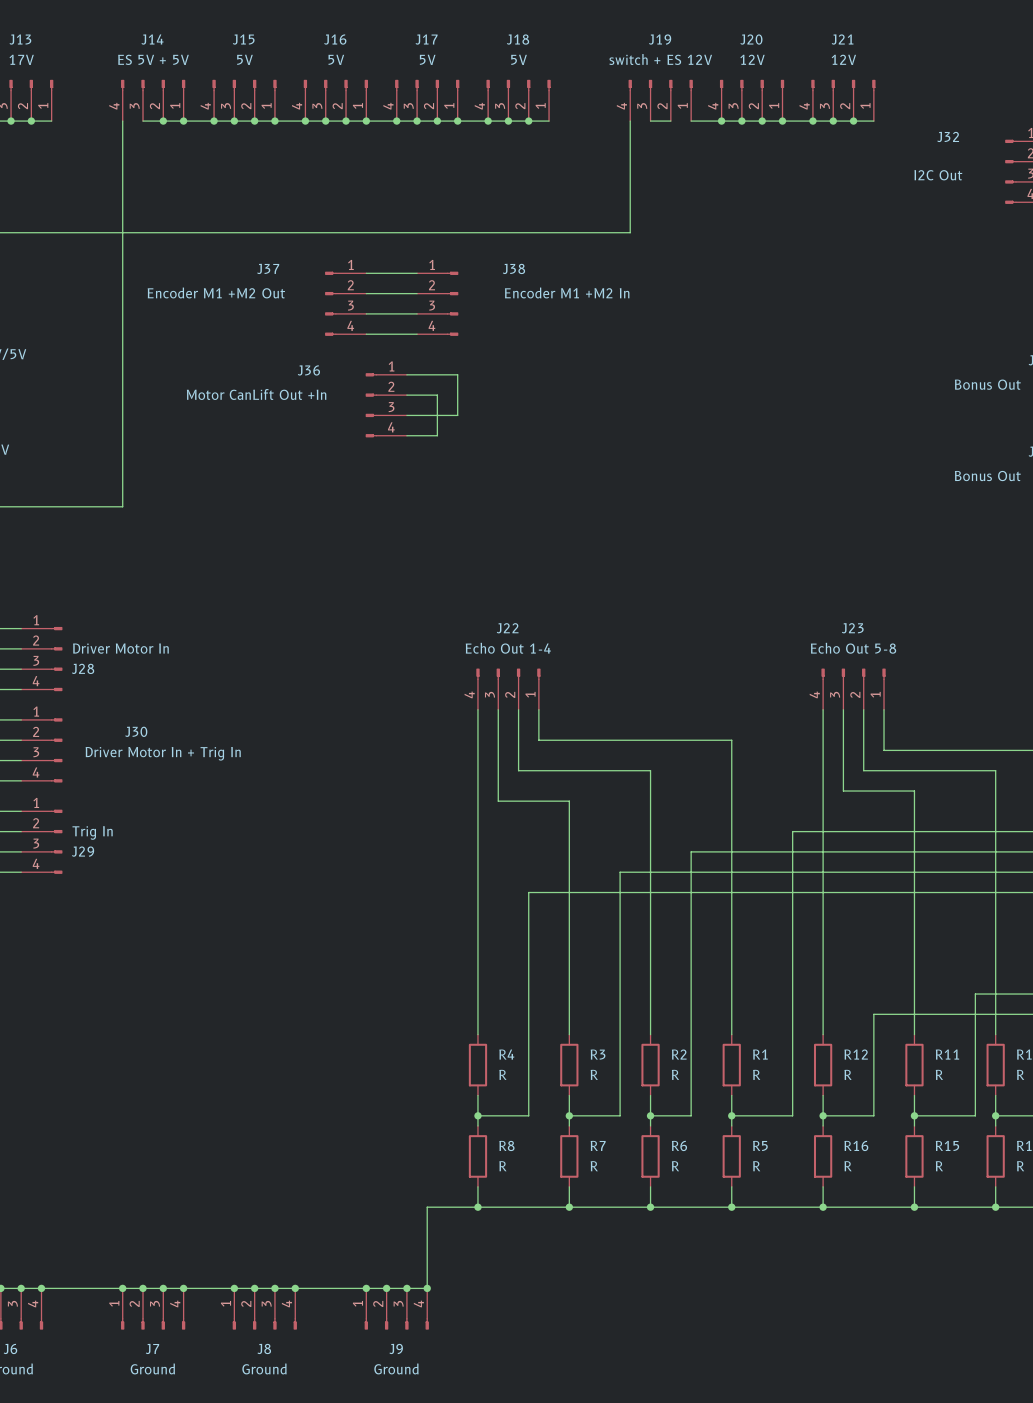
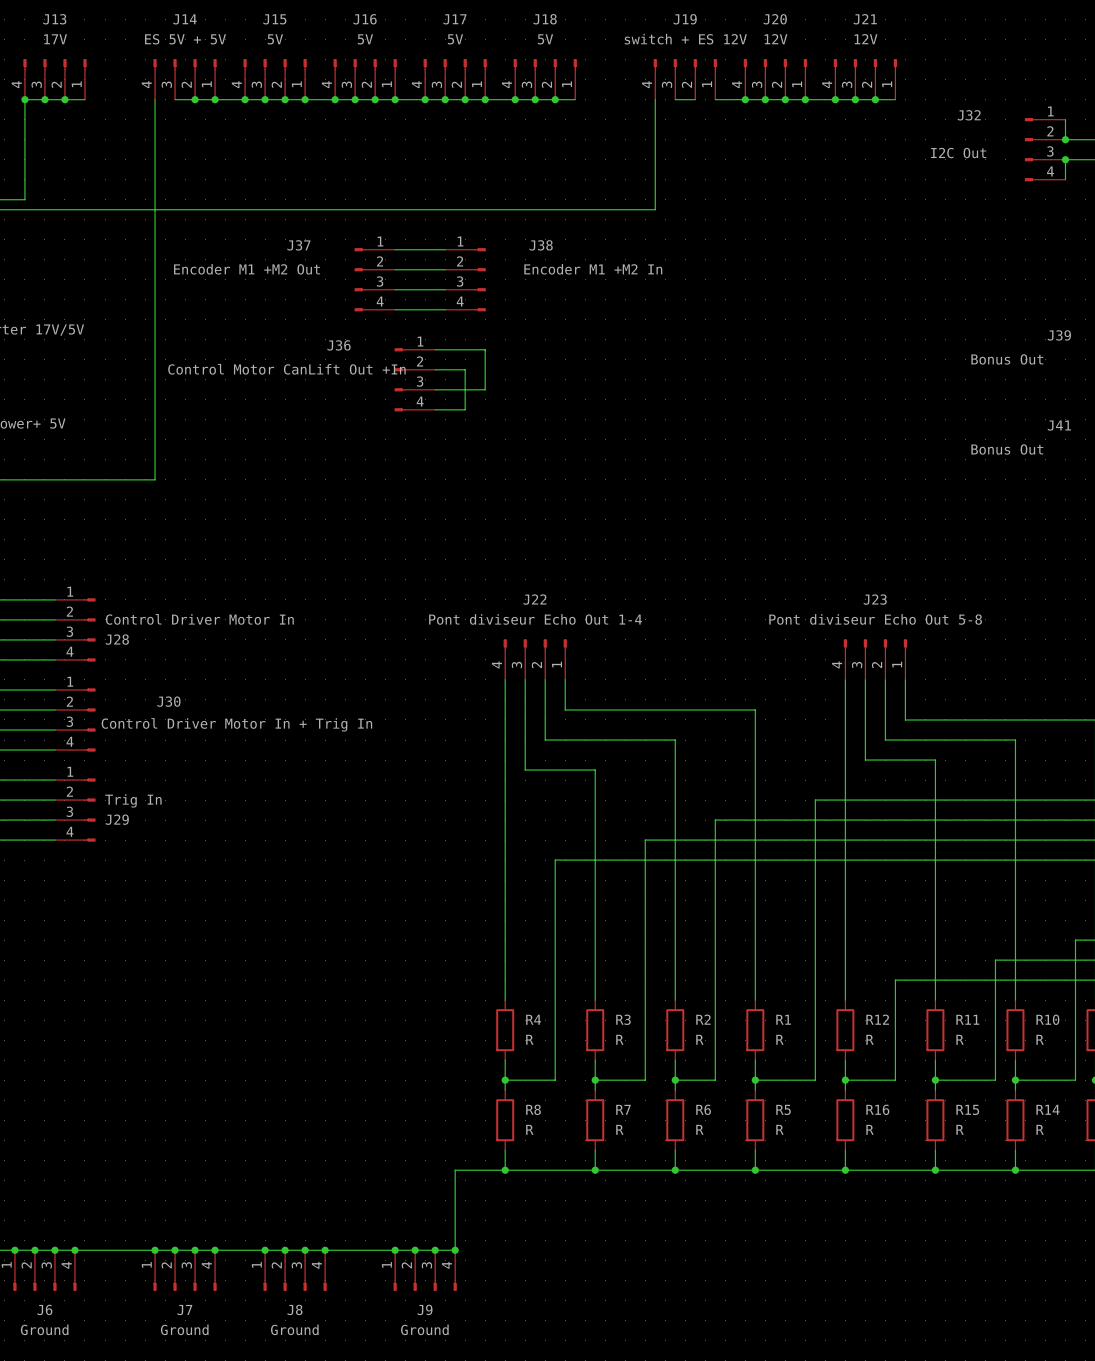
J36 value: Motor CanLift Out +In (256, 394) -> Control Motor CanLift Out +In (286, 369)
J28 value: Driver Motor In (120, 648) -> Control Driver Motor In (199, 619)
J22 value: Echo Out 1-4 (508, 648) -> Pont diviseur Echo Out 1-4 (535, 619)
J23 value: Echo Out 5-8 (853, 648) -> Pont diviseur Echo Out 5-8 (875, 619)
J30 value: Driver Motor In + Trig In (163, 753) -> Control Driver Motor In + Trig In (236, 724)

